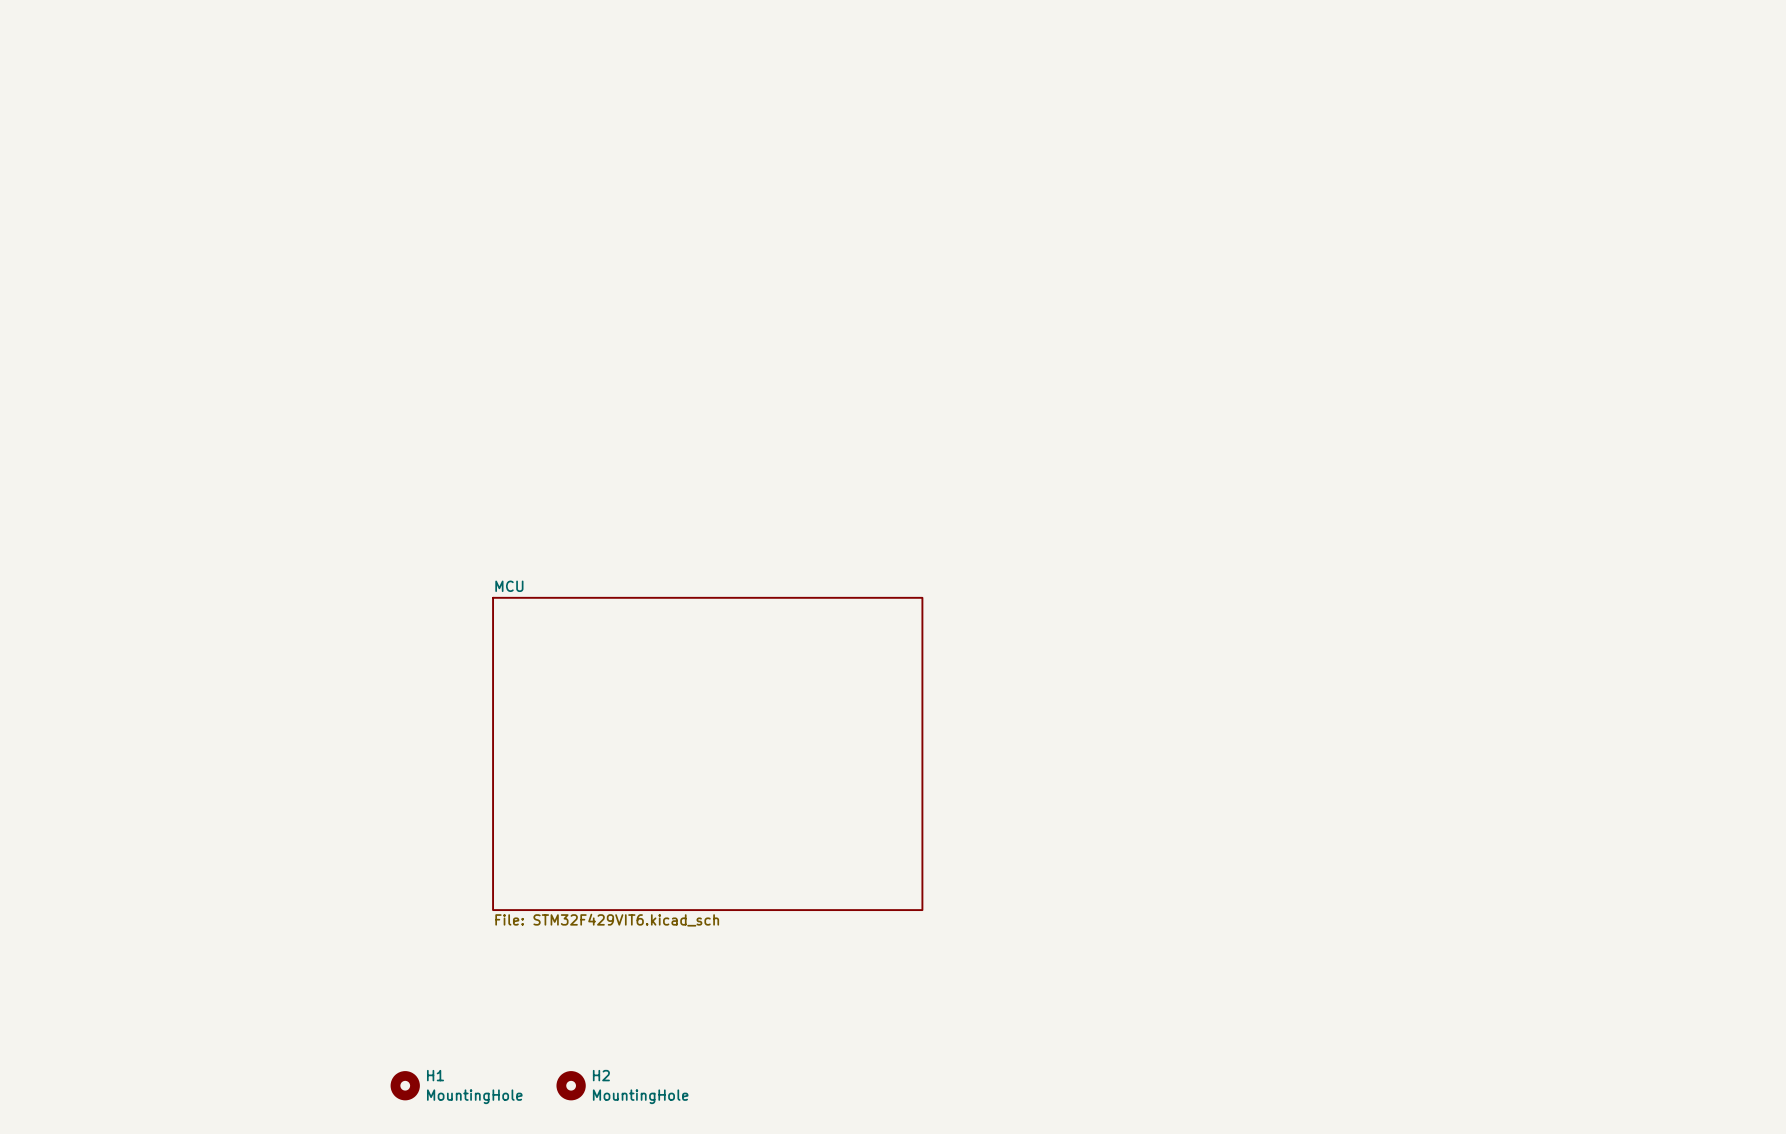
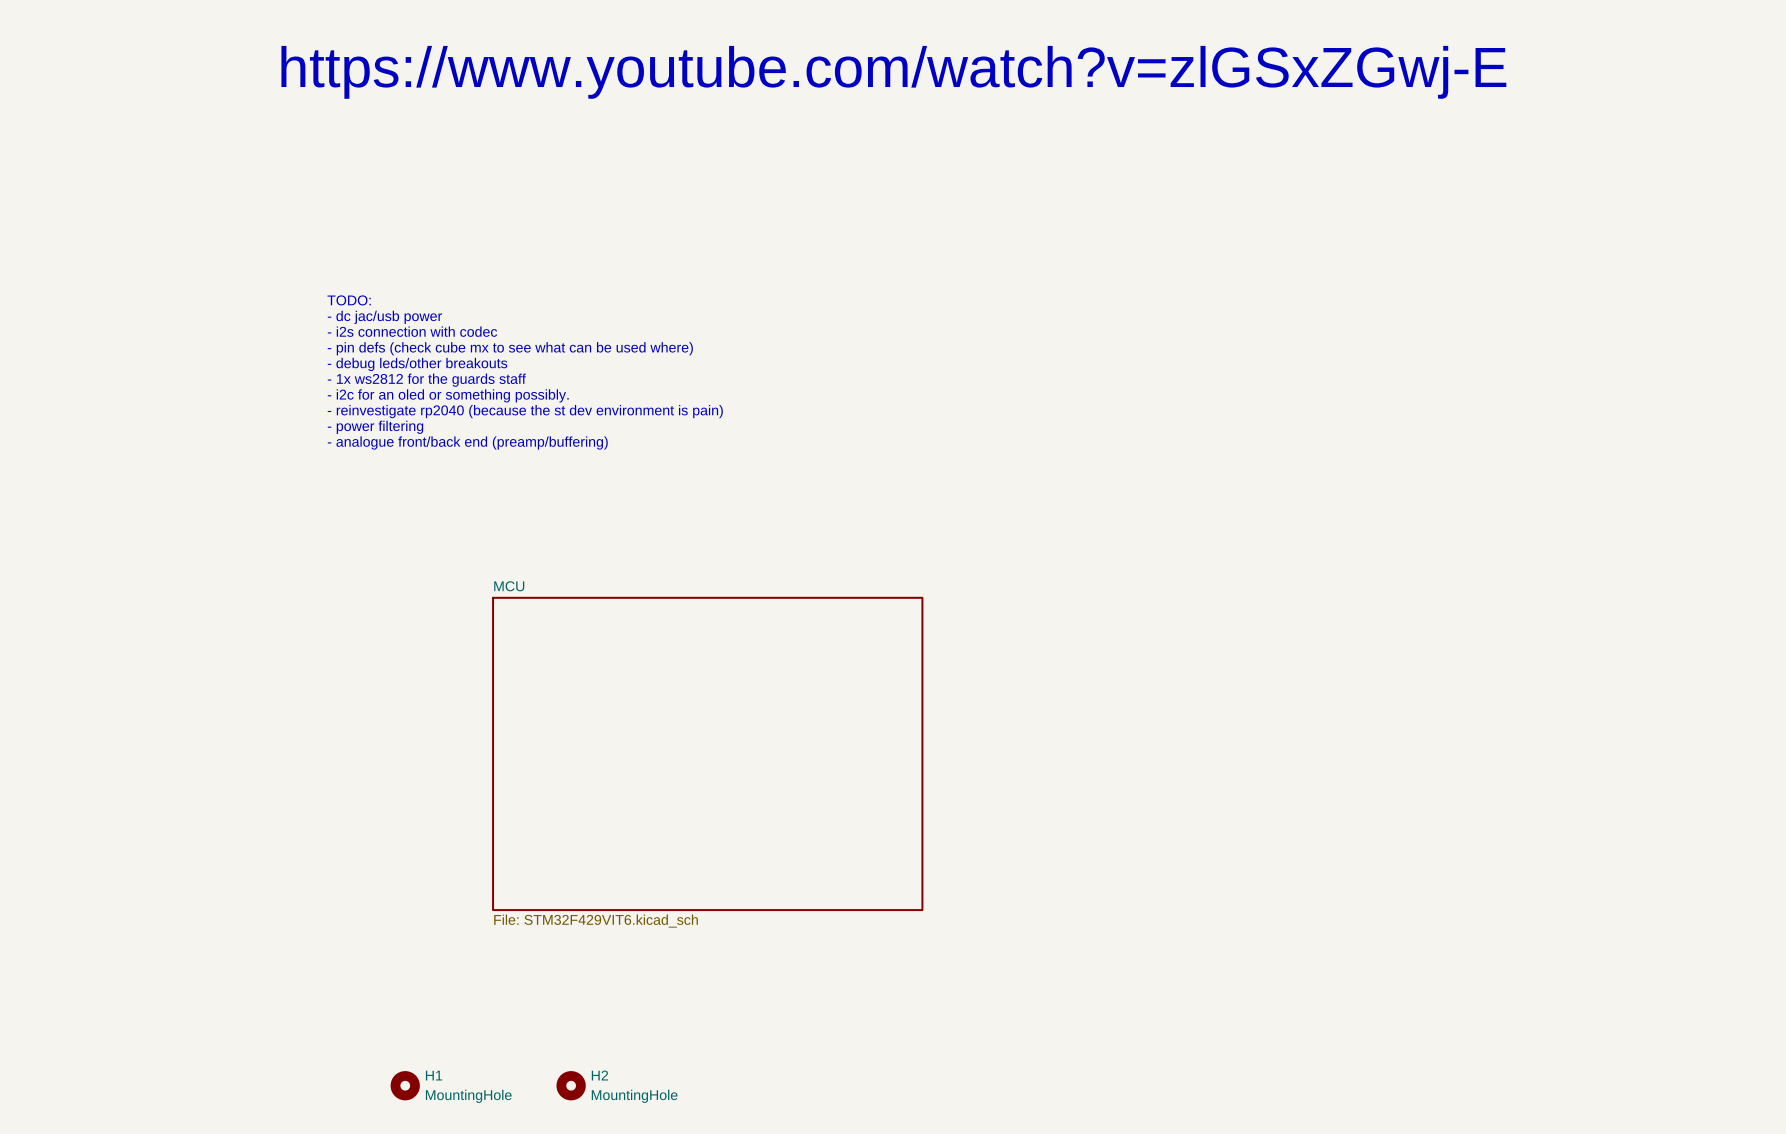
text: none -> https://www.youtube.com/watch?v=zlGSxZGwj-E (893, 72)
text: none -> TODO: (349, 300)
text: none -> - dc jac/usb power (384, 317)
text: none -> - i2s connection with codec (412, 331)
text: none -> - pin defs (check cube mx to see what can be used where) (510, 348)
text: none -> - debug leds/other breakouts (417, 364)
text: none -> - 1x ws2812 for the guards staff (426, 380)
text: none -> - i2c for an oled or something possibly. (448, 395)
text: none -> - reinvestigate rp2040 (because the st dev environment is pain) (525, 411)
text: none -> - power filtering (375, 427)
text: none -> - analogue front/back end (preamp/buffering) (467, 443)

